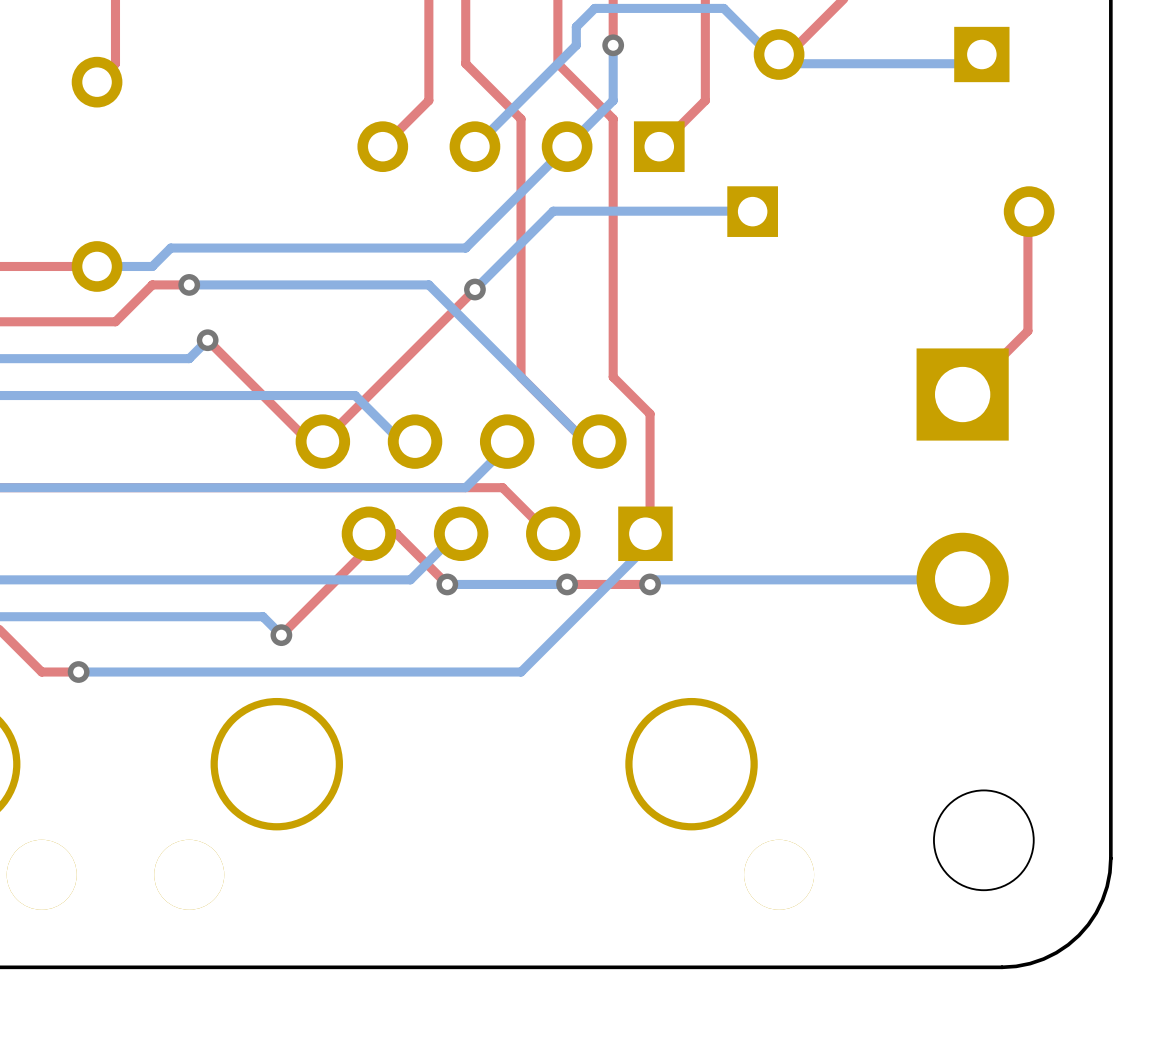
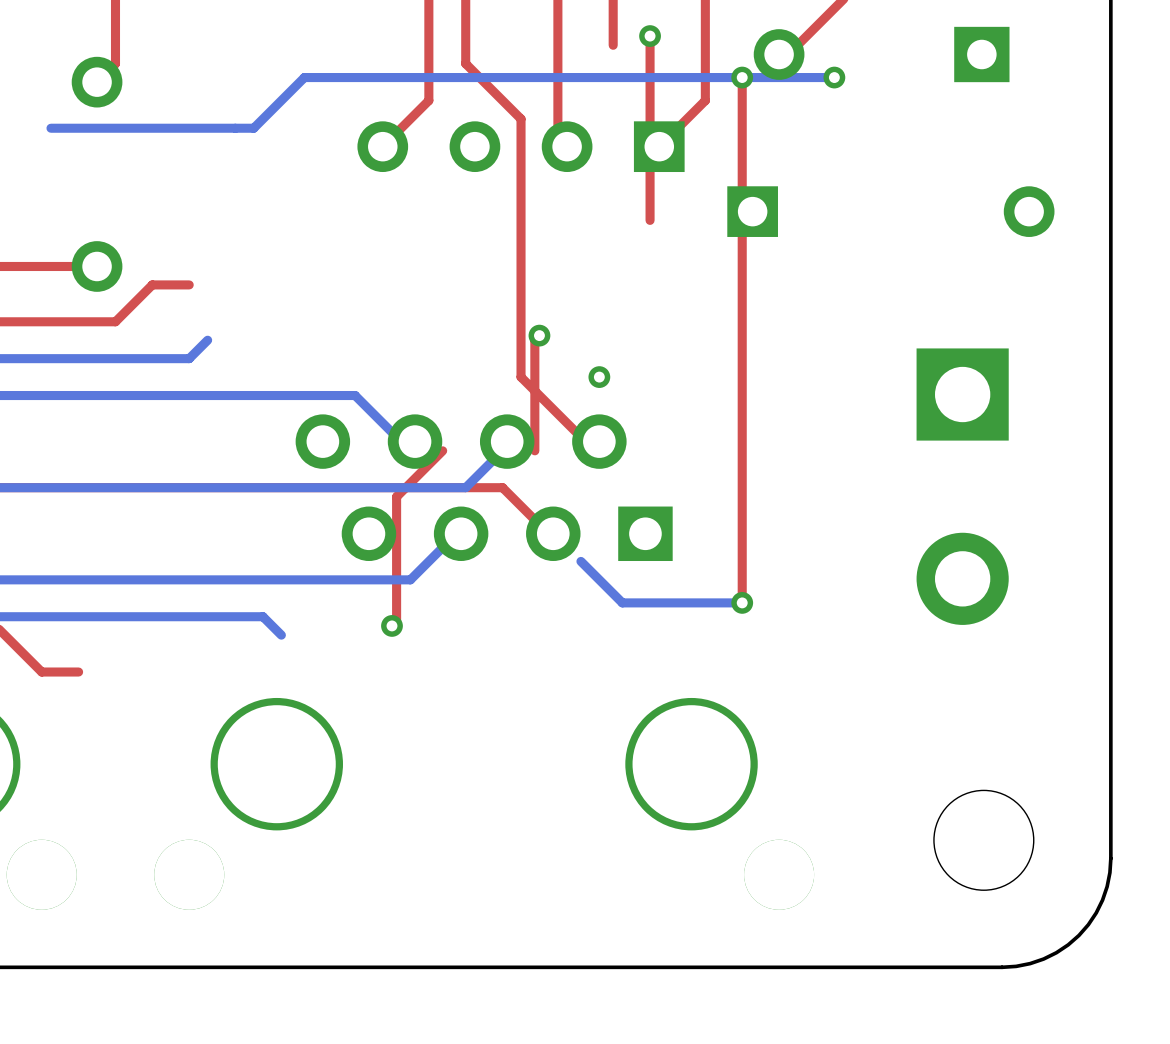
top track: none -> (650, 36) (650, 220)
bottom track: (613, 45) (613, 100) (465, 248) (170, 248) (152, 266) (97, 266) -> none
via position: (613, 45) -> (650, 36)
bottom track: (981, 54) (981, 63) (779, 63) -> none
top track: (557, 63) (613, 119) (613, 377) (650, 413) (650, 542) (645, 533) -> (557, 63) (557, 128)
bottom track: (779, 63) (723, 8) (594, 8) (576, 26) (576, 45) (474, 146) -> none
top track: none -> (742, 77) (742, 602)
via: none -> (742, 77)
bottom track: none -> (834, 77) (304, 77) (253, 128) (50, 128)
via: none -> (834, 77)
bottom track: (752, 211) (553, 211) (474, 289) -> none
top track: (1029, 211) (1027, 331) (962, 394) -> none
bottom track: (189, 284) (428, 284) (594, 450) (599, 441) -> none
via: (189, 284) -> none
top track: (474, 289) (322, 441) (318, 450) (207, 340) -> none
via: (474, 289) -> none
top track: none -> (539, 335) (534, 340) (534, 450)
via: none -> (539, 335)
via: (207, 340) -> none
via: none -> (599, 377)
top track: none -> (442, 450) (396, 496) (396, 621) (391, 625)
bottom track: (645, 533) (650, 542) (521, 672) (78, 672) -> none
bottom track: none -> (580, 561) (622, 602) (742, 602)
bottom track: (962, 578) (654, 579) (650, 584) -> none
top track: (447, 584) (396, 533) (368, 533) (373, 542) (281, 635) -> none
via: (447, 584) -> none
bottom track: (567, 584) (447, 584) -> none
via: (567, 584) -> none
top track: (650, 584) (567, 584) -> none
via: (650, 584) -> none
via: none -> (742, 602)
via: none -> (391, 625)
via: (281, 635) -> none
via: (78, 672) -> none

